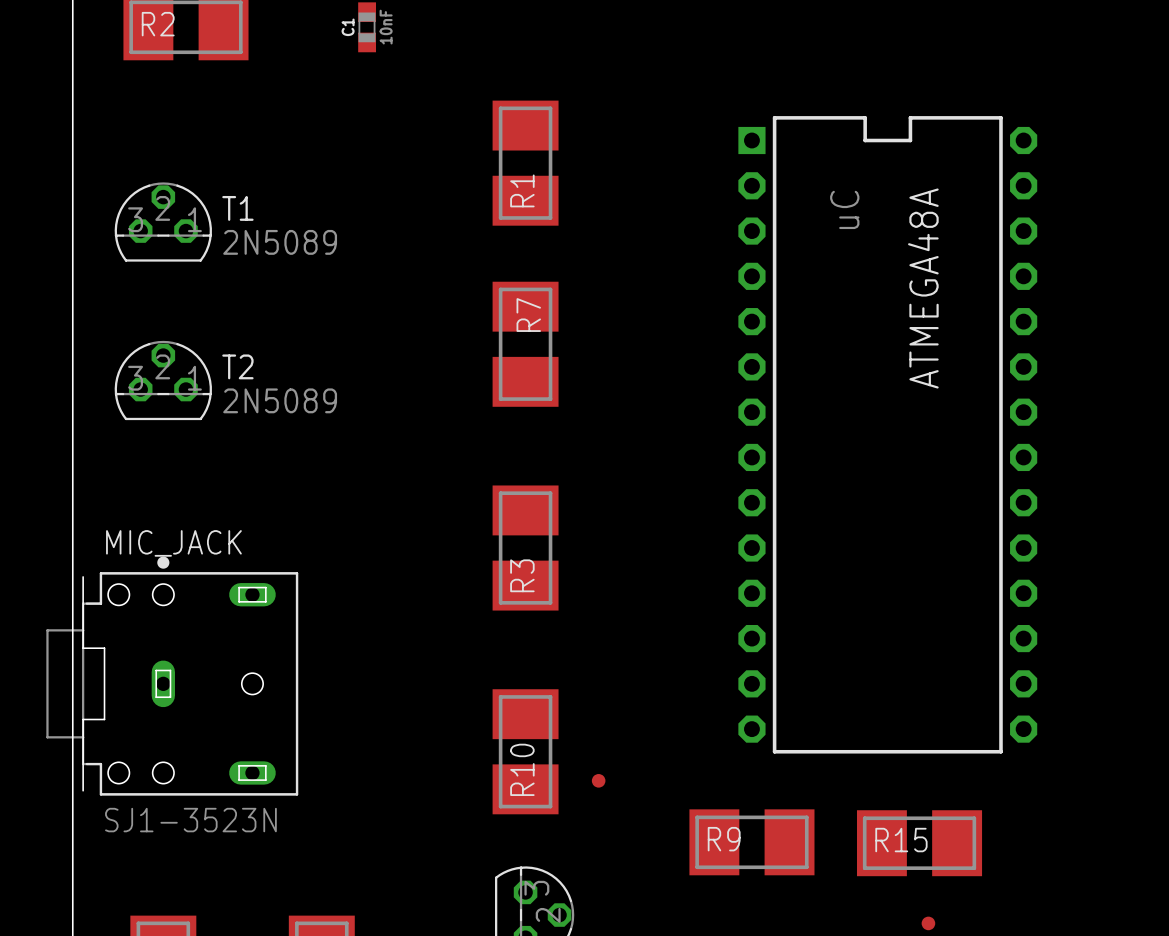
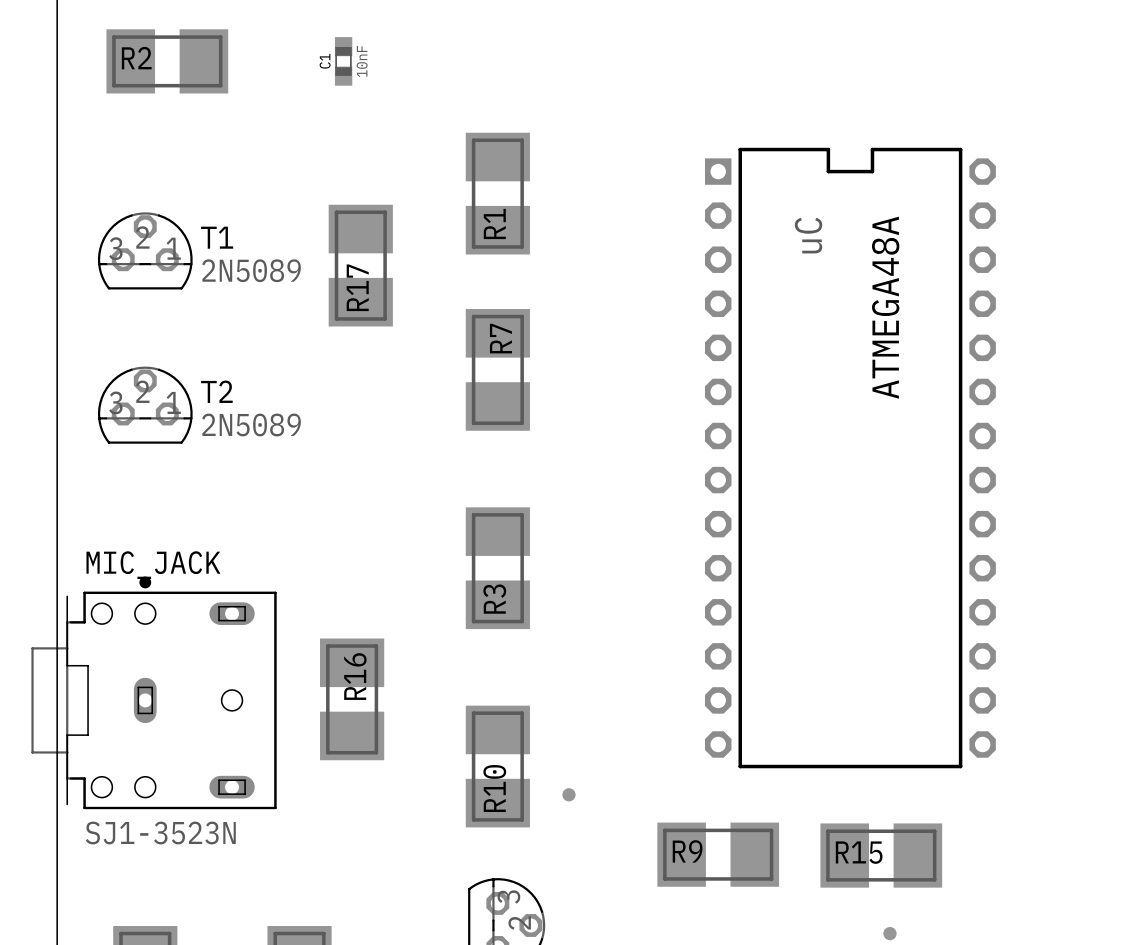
R17: none -> (360, 265)
R16: none -> (352, 699)

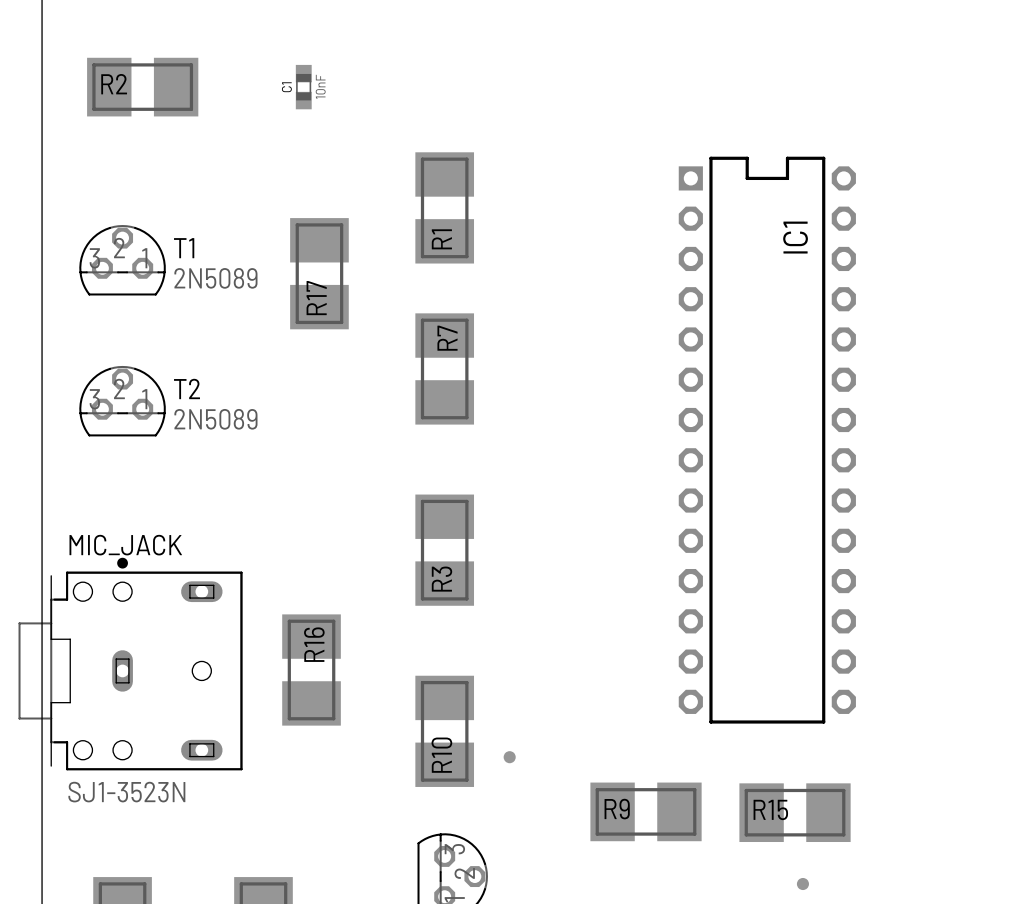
IC1: none -> (767, 440)
ATMEGA48A: uC (850, 458) -> none

